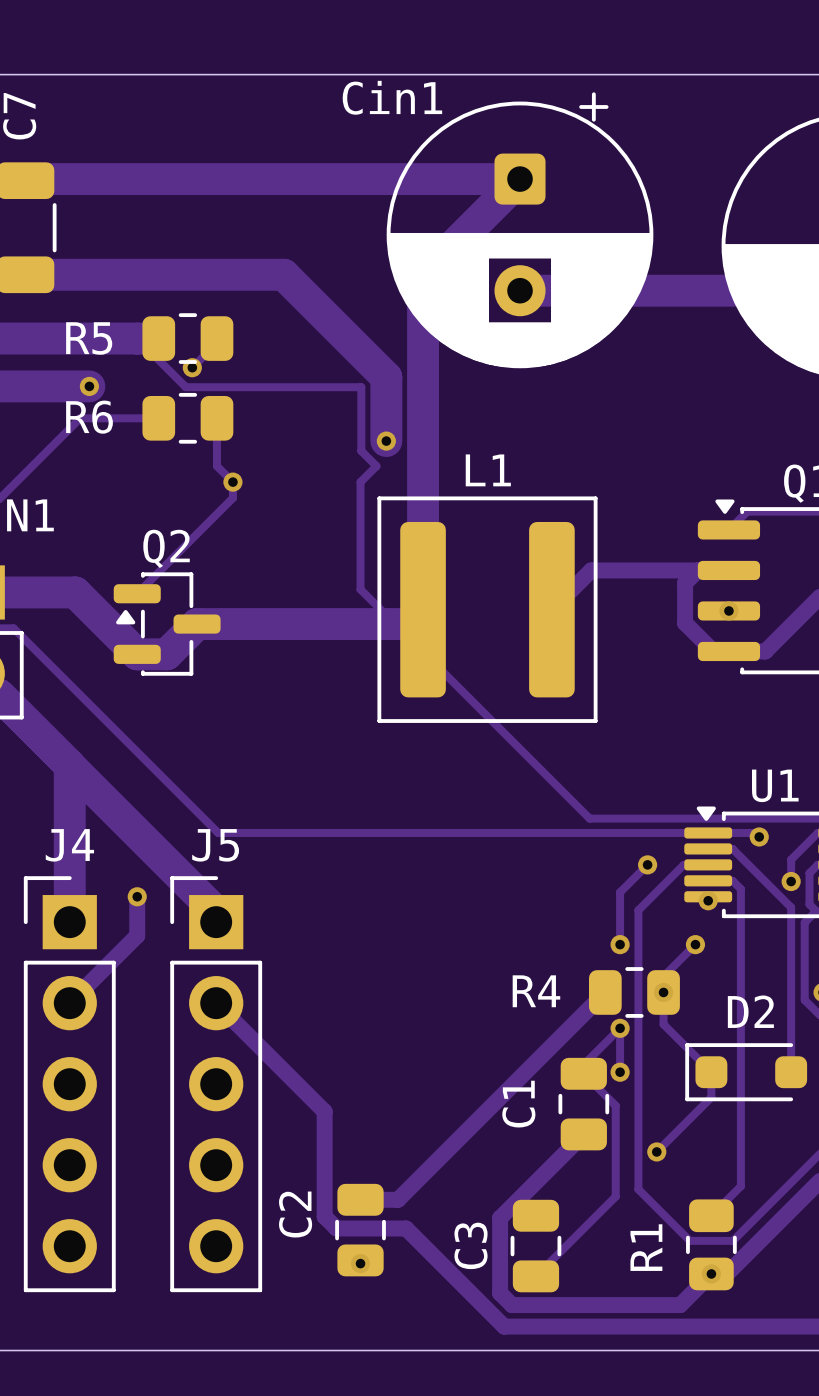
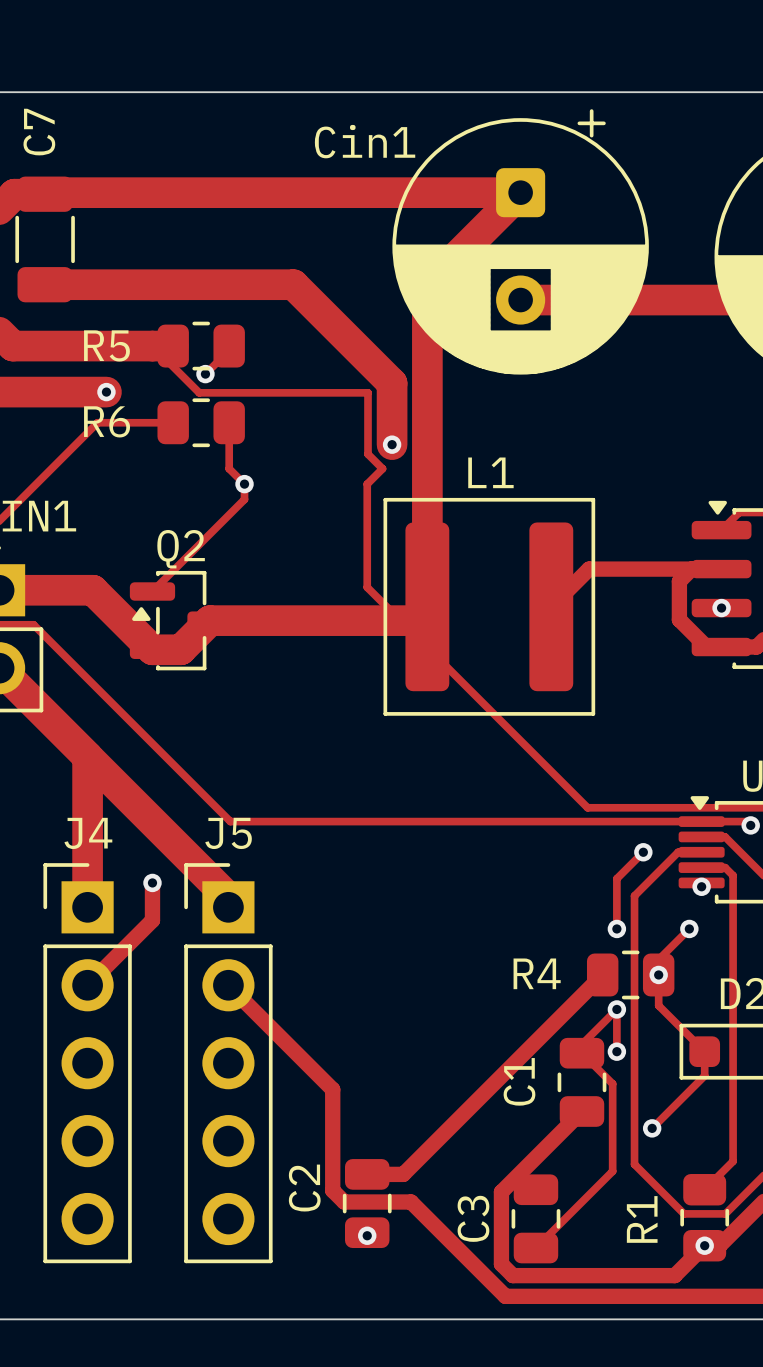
Cin1 name position: Cin1 (392, 97) -> Cin1 (365, 141)

